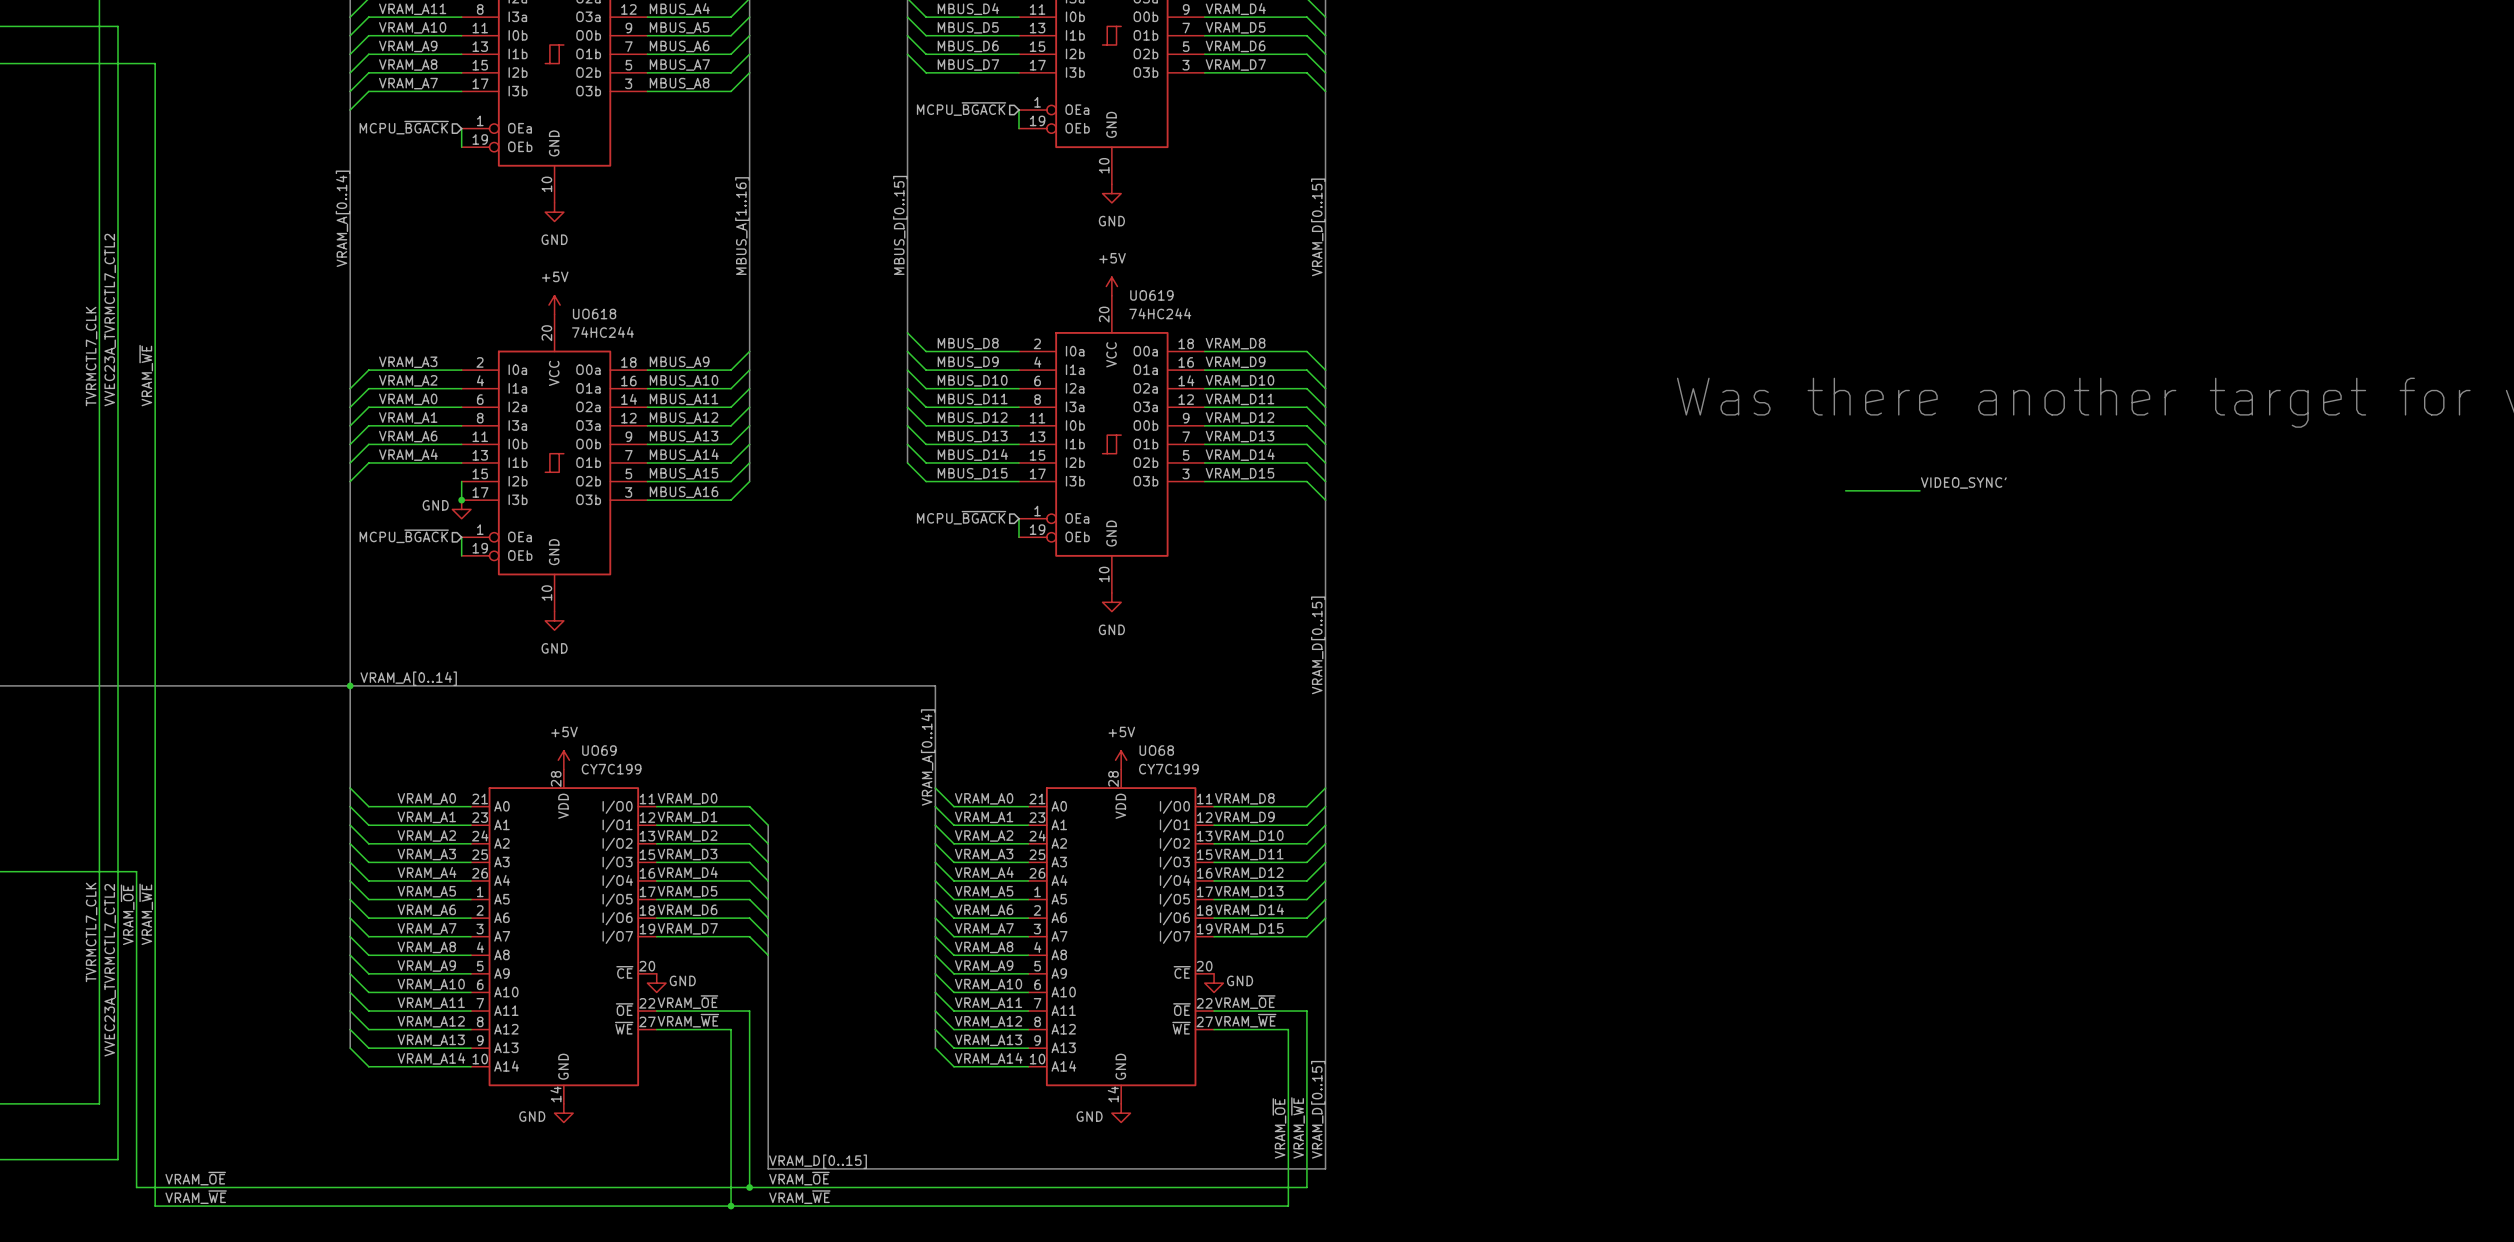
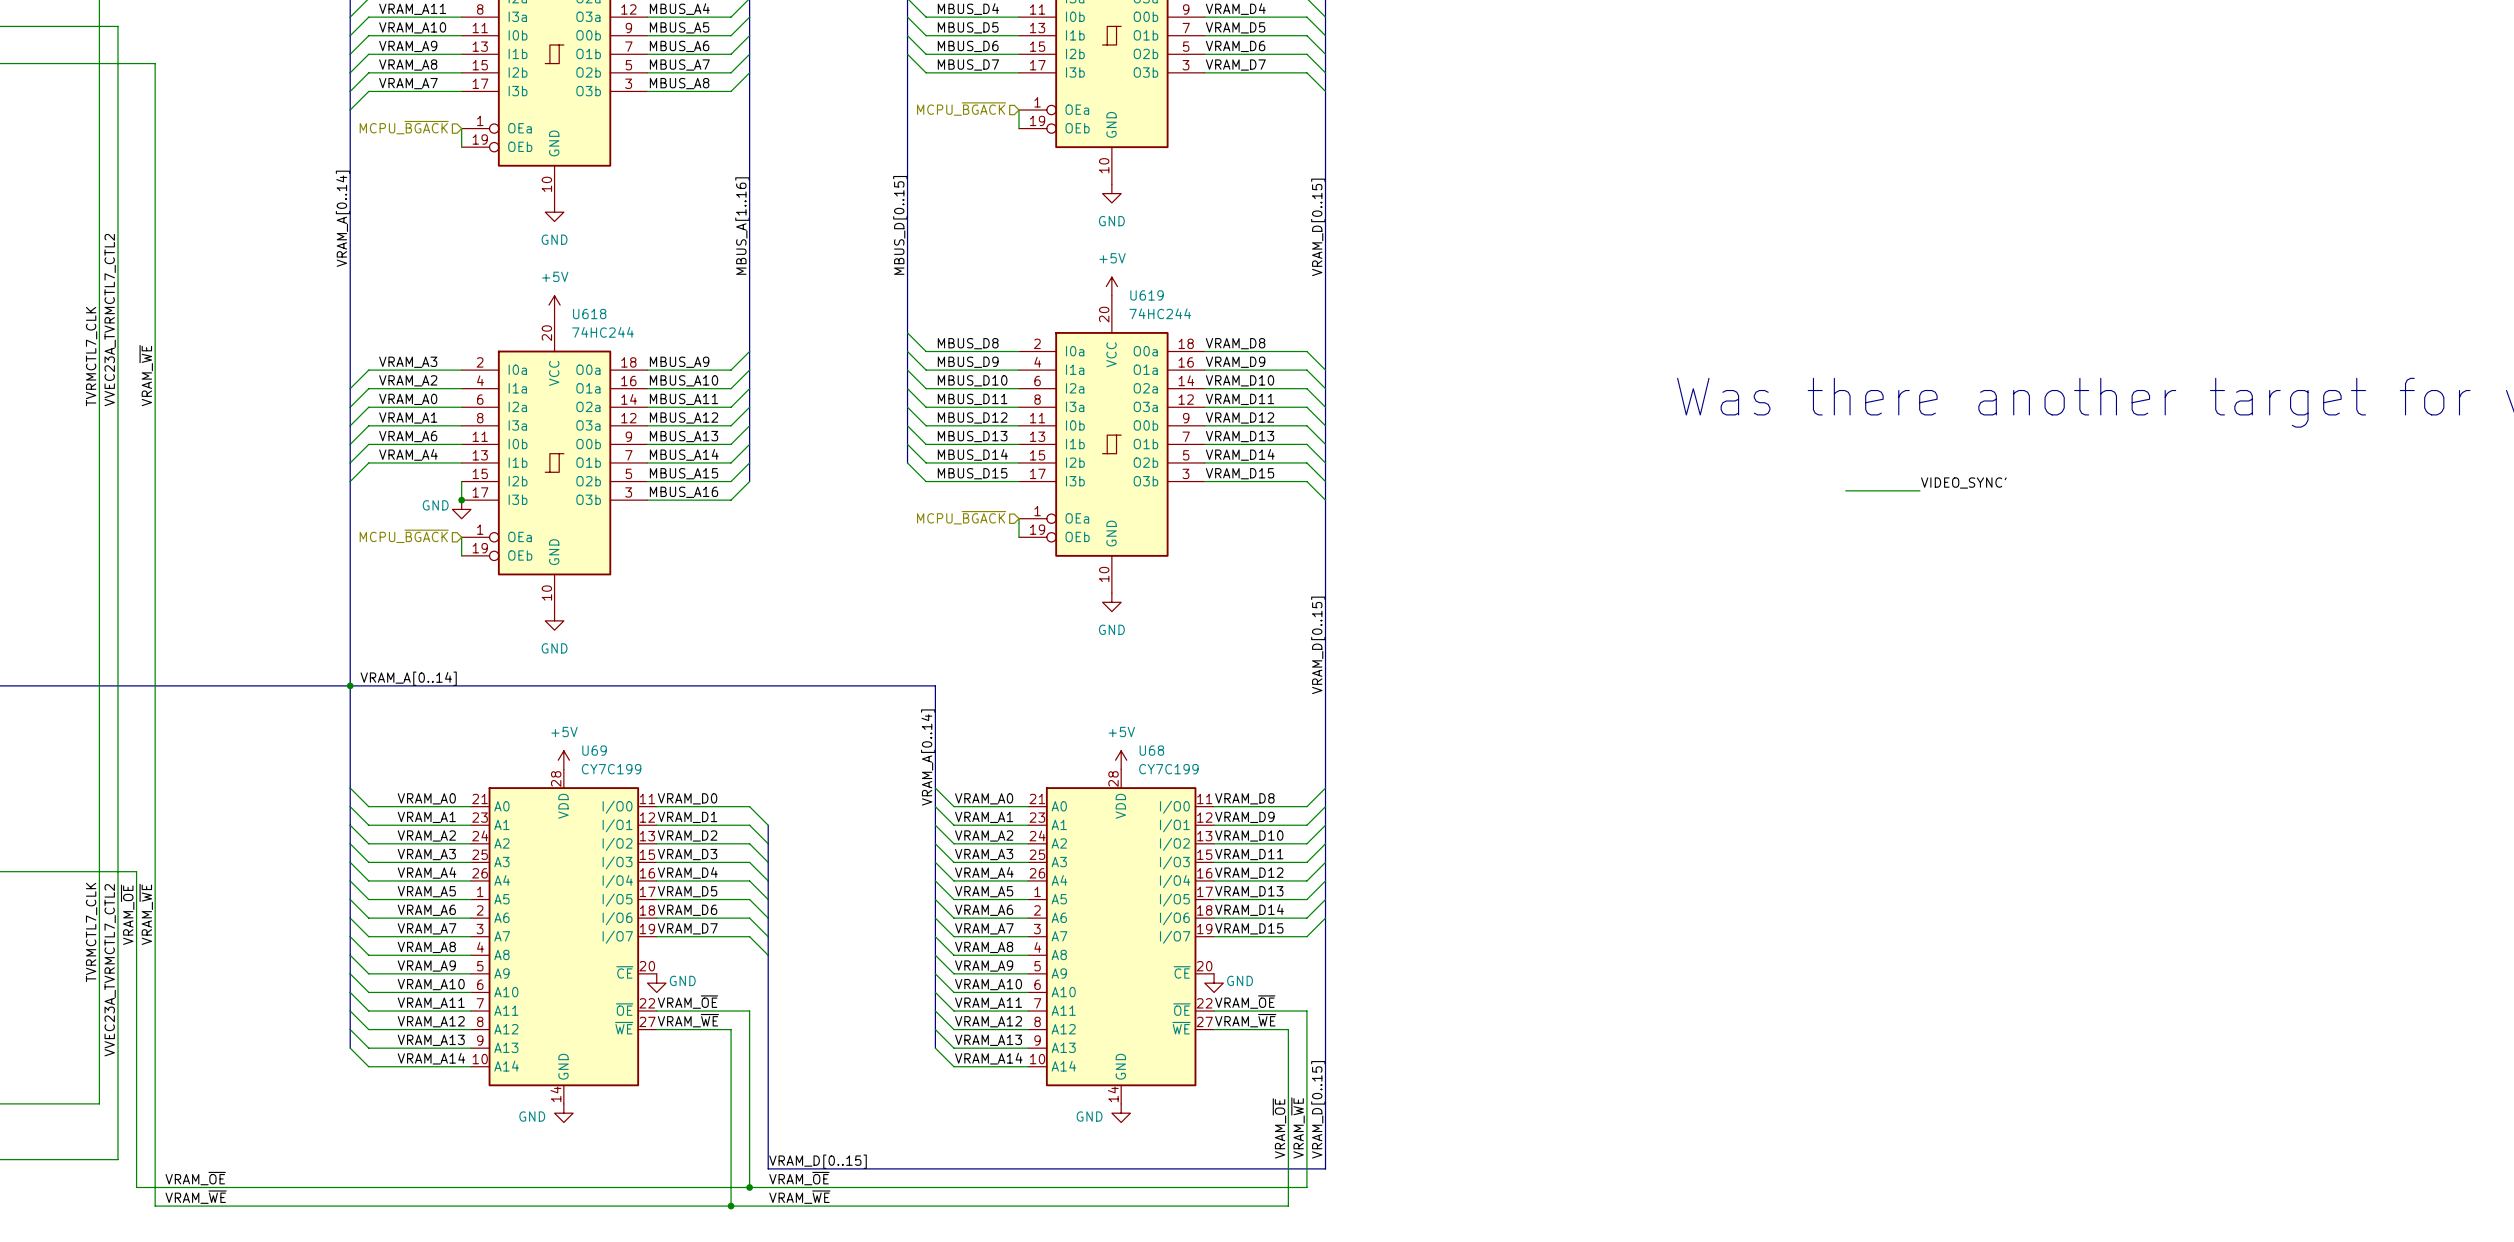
UO619 name: UO619 (1151, 295) -> U619 (1147, 295)
UO618 name: UO618 (594, 314) -> U618 (589, 314)
UO69 name: UO69 (599, 750) -> U69 (594, 750)
UO68 name: UO68 (1156, 750) -> U68 (1151, 750)

